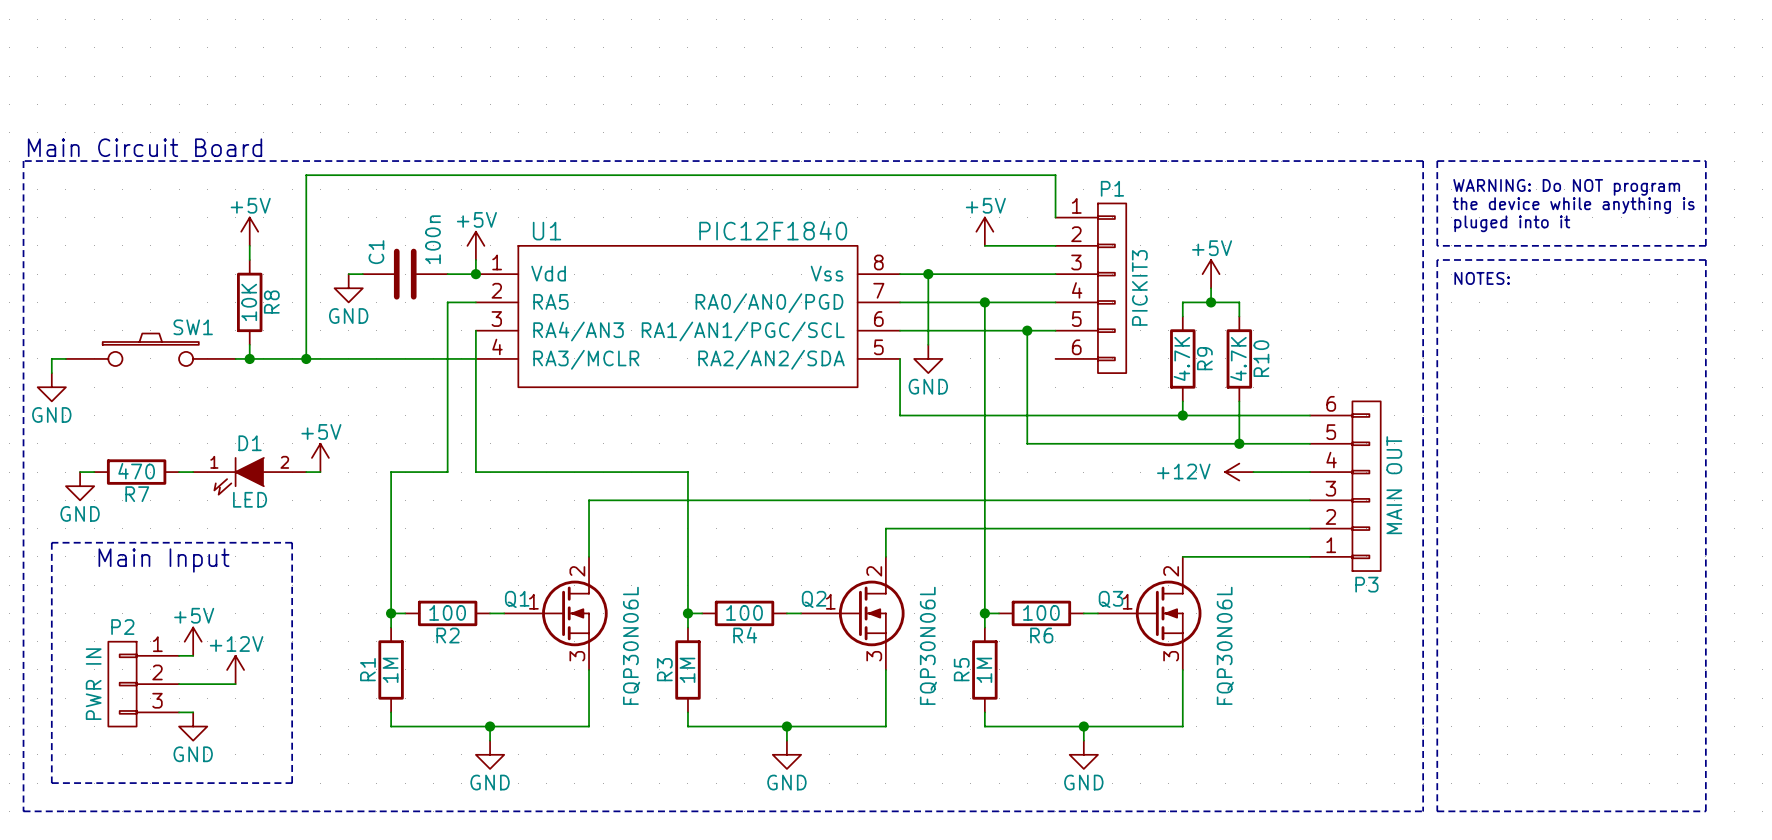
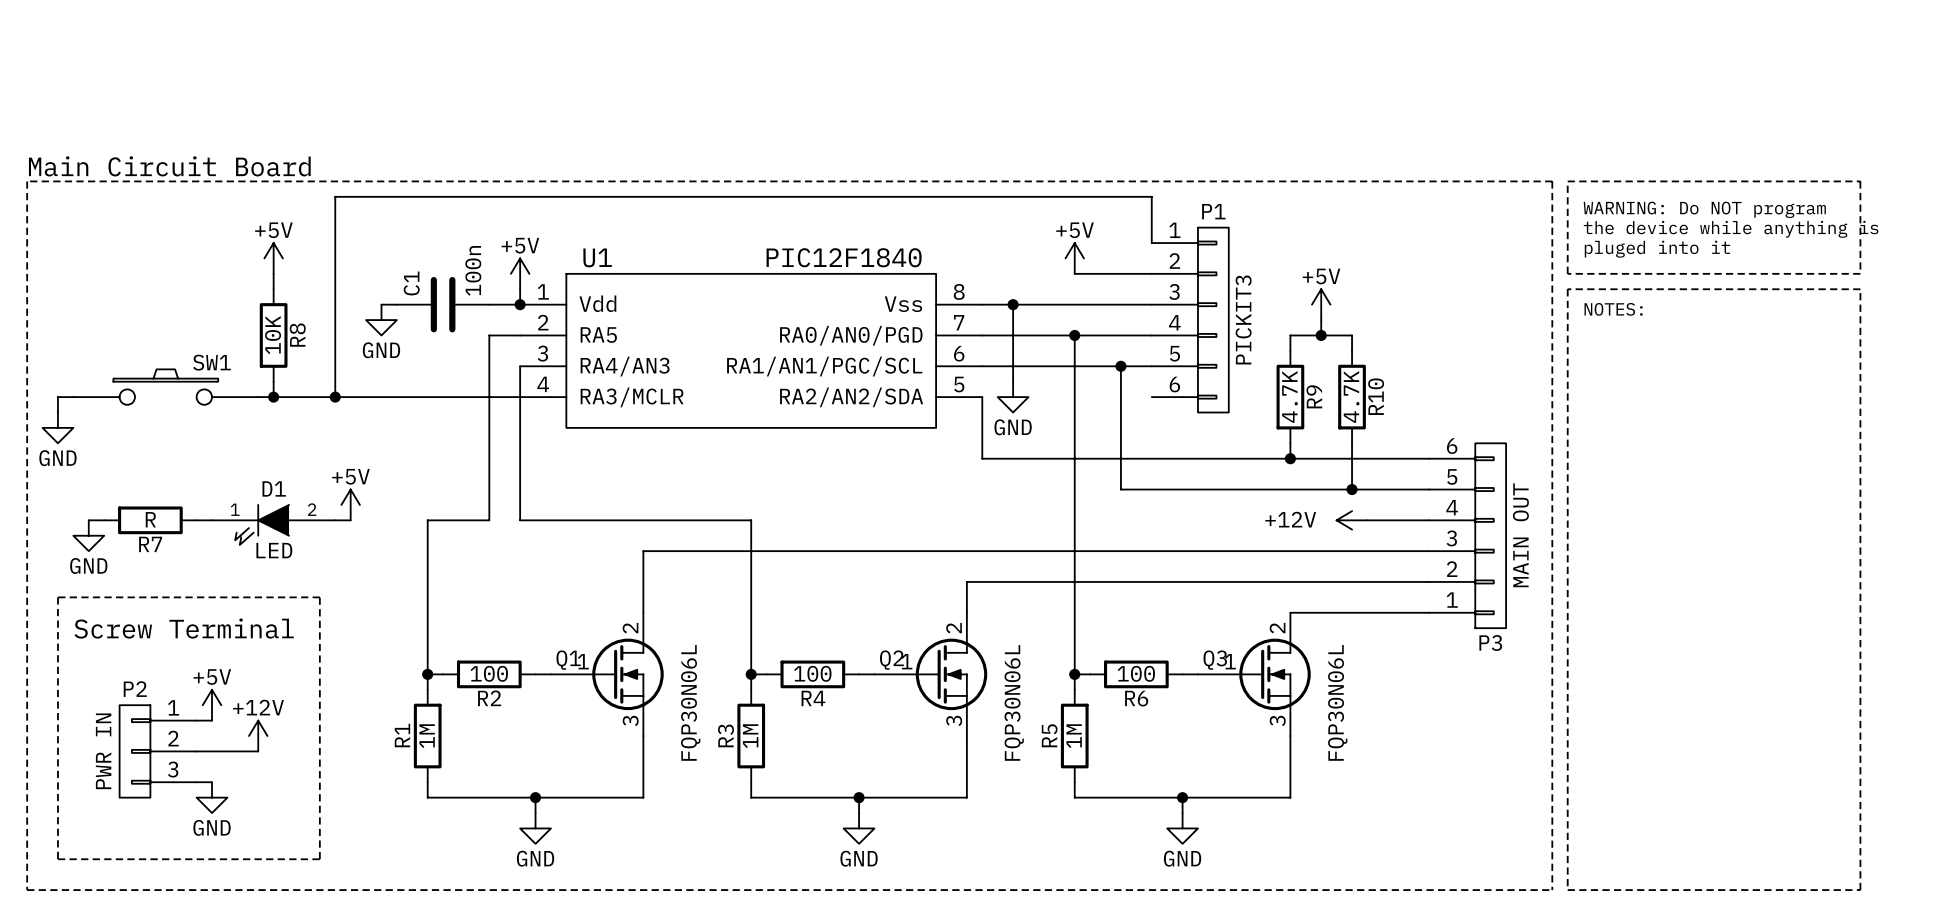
R7 value: 470 (136, 471) -> R (150, 519)
text: Main Input (163, 560) -> none
text: none -> Screw Terminal (184, 628)

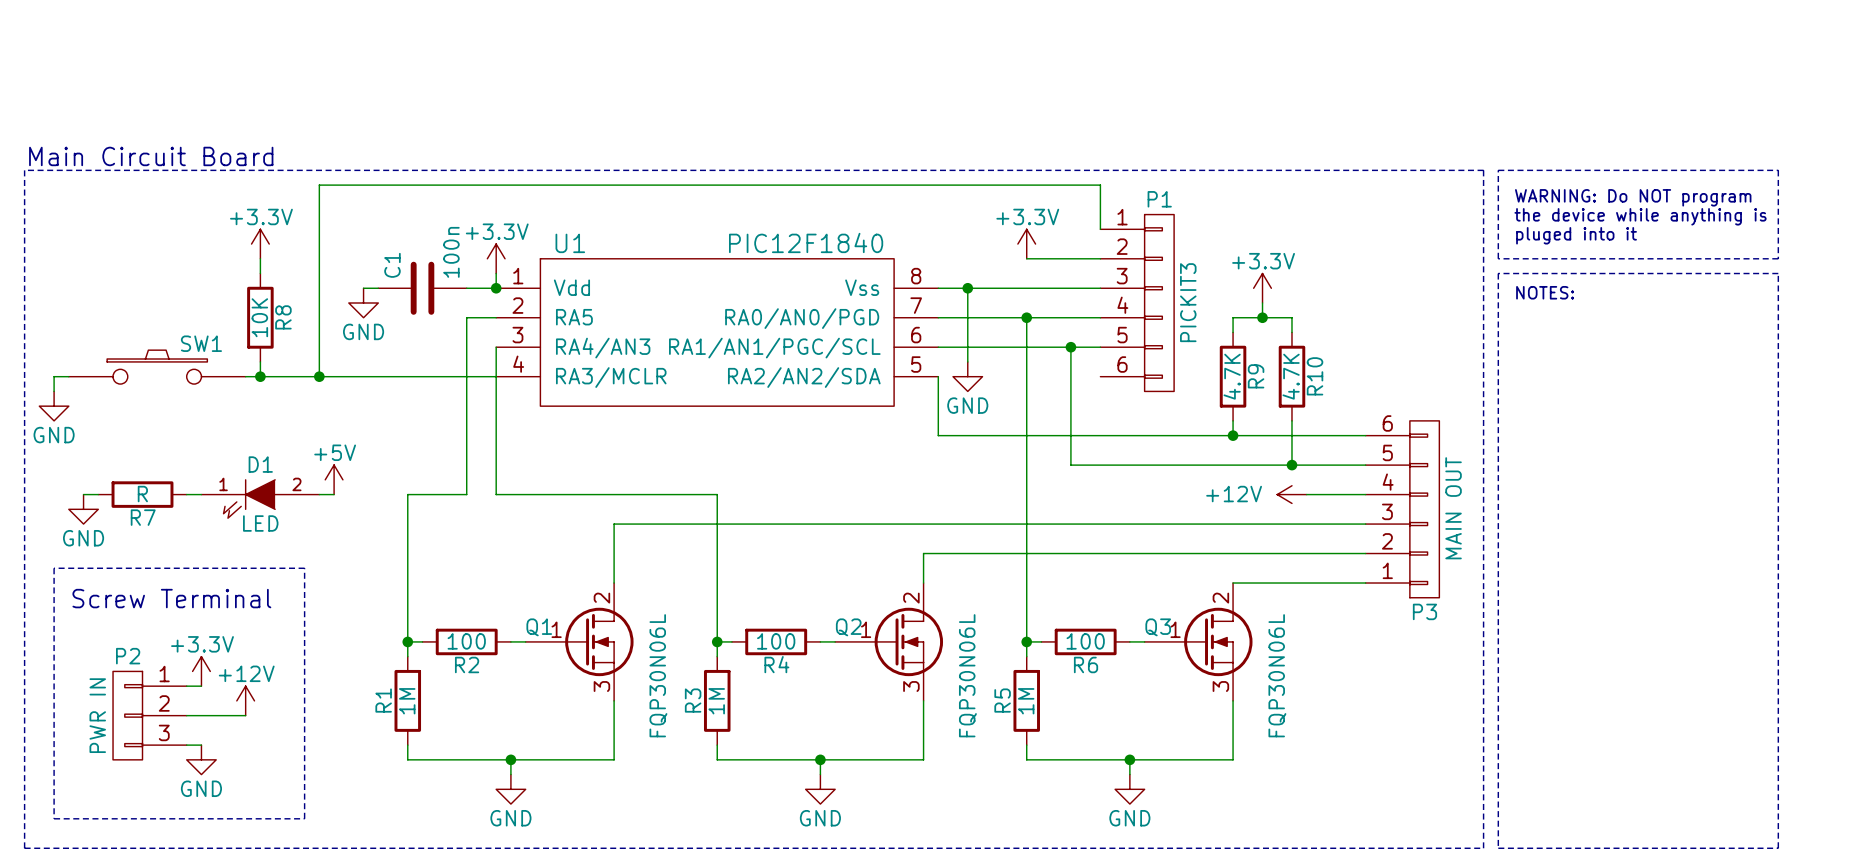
power symbol: +5V (273, 258) -> +3.3V (260, 244)
power symbol: +5V (1074, 258) -> +3.3V (1026, 244)
power symbol: +5V (520, 273) -> +3.3V (496, 258)
power symbol: +5V (1321, 304) -> +3.3V (1262, 288)
power symbol: +5V (212, 705) -> +3.3V (201, 671)

